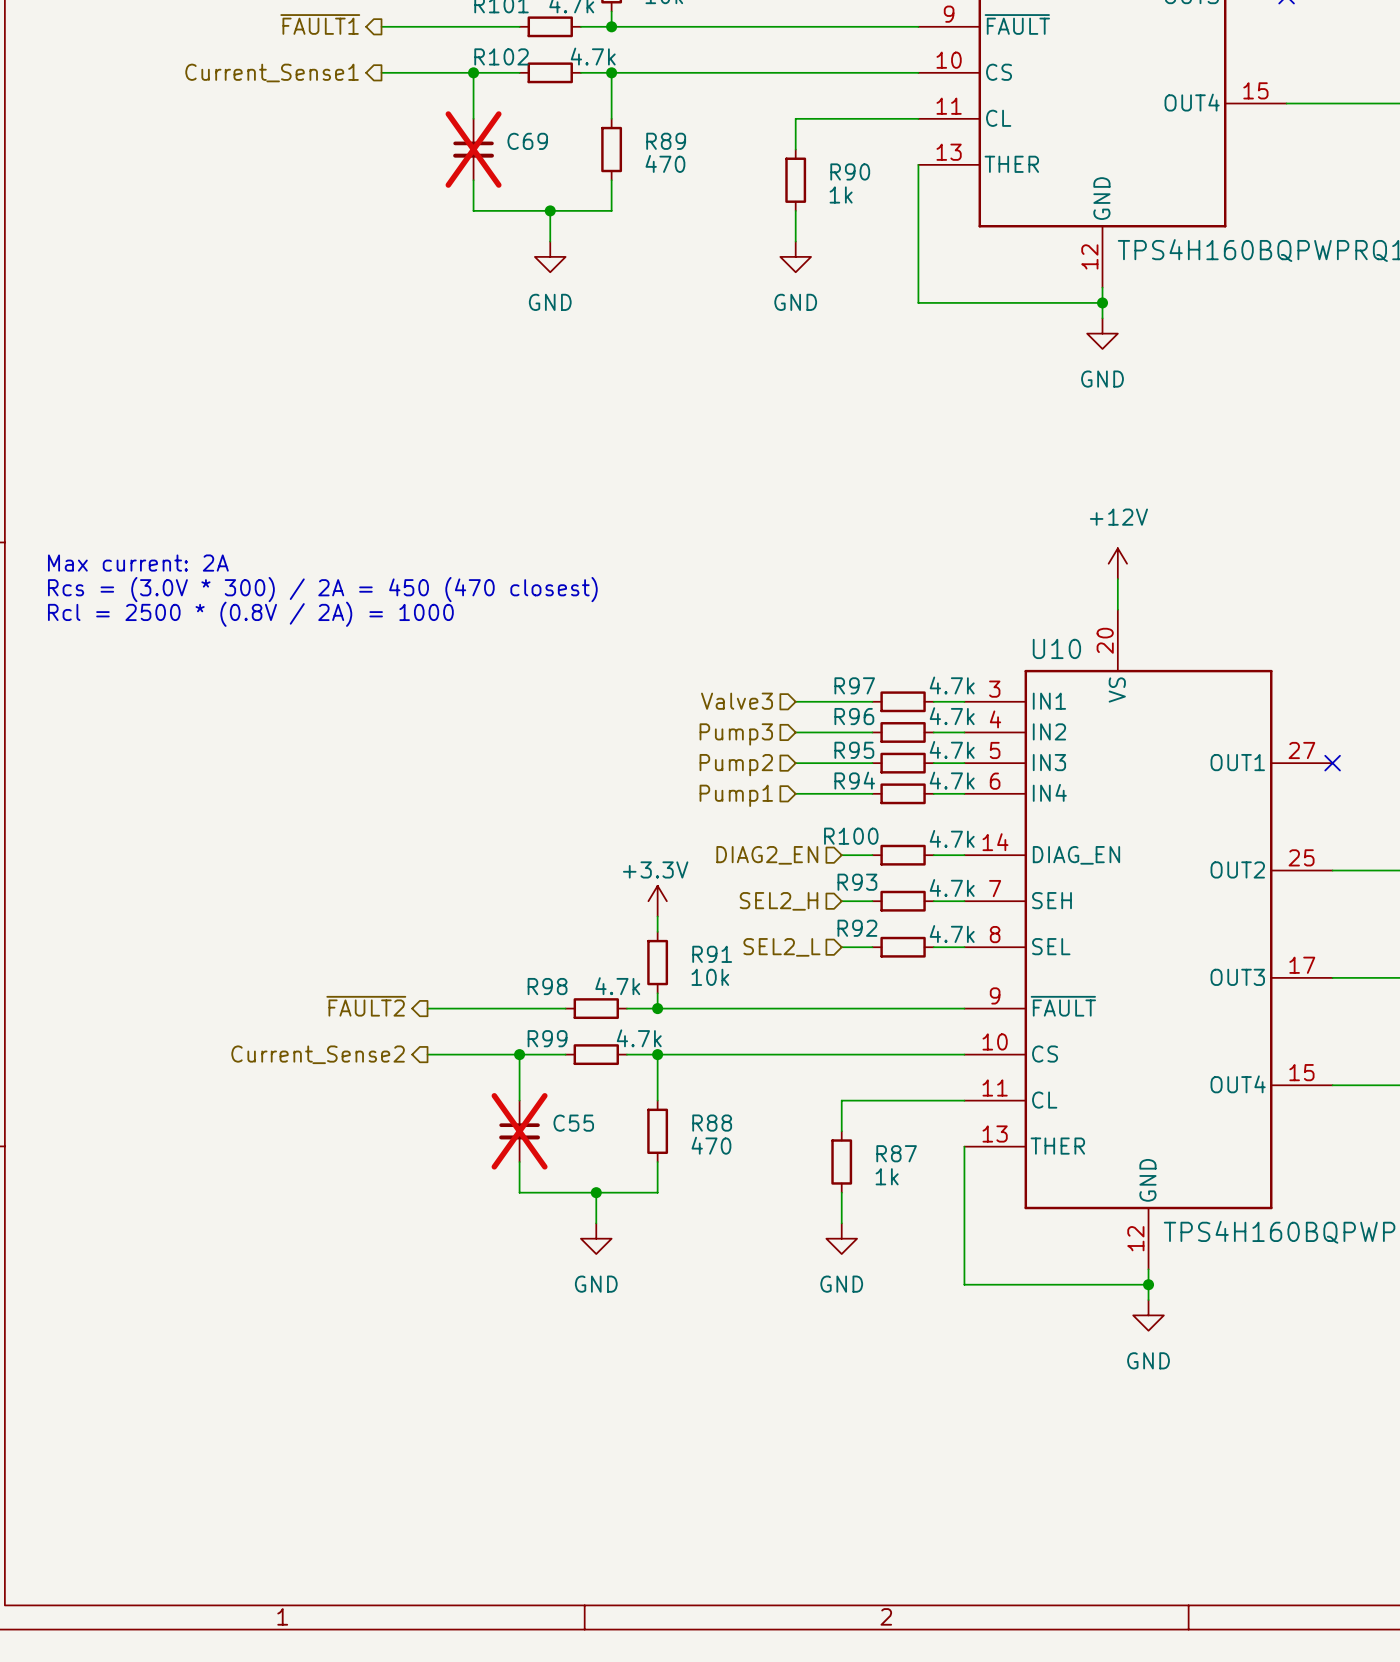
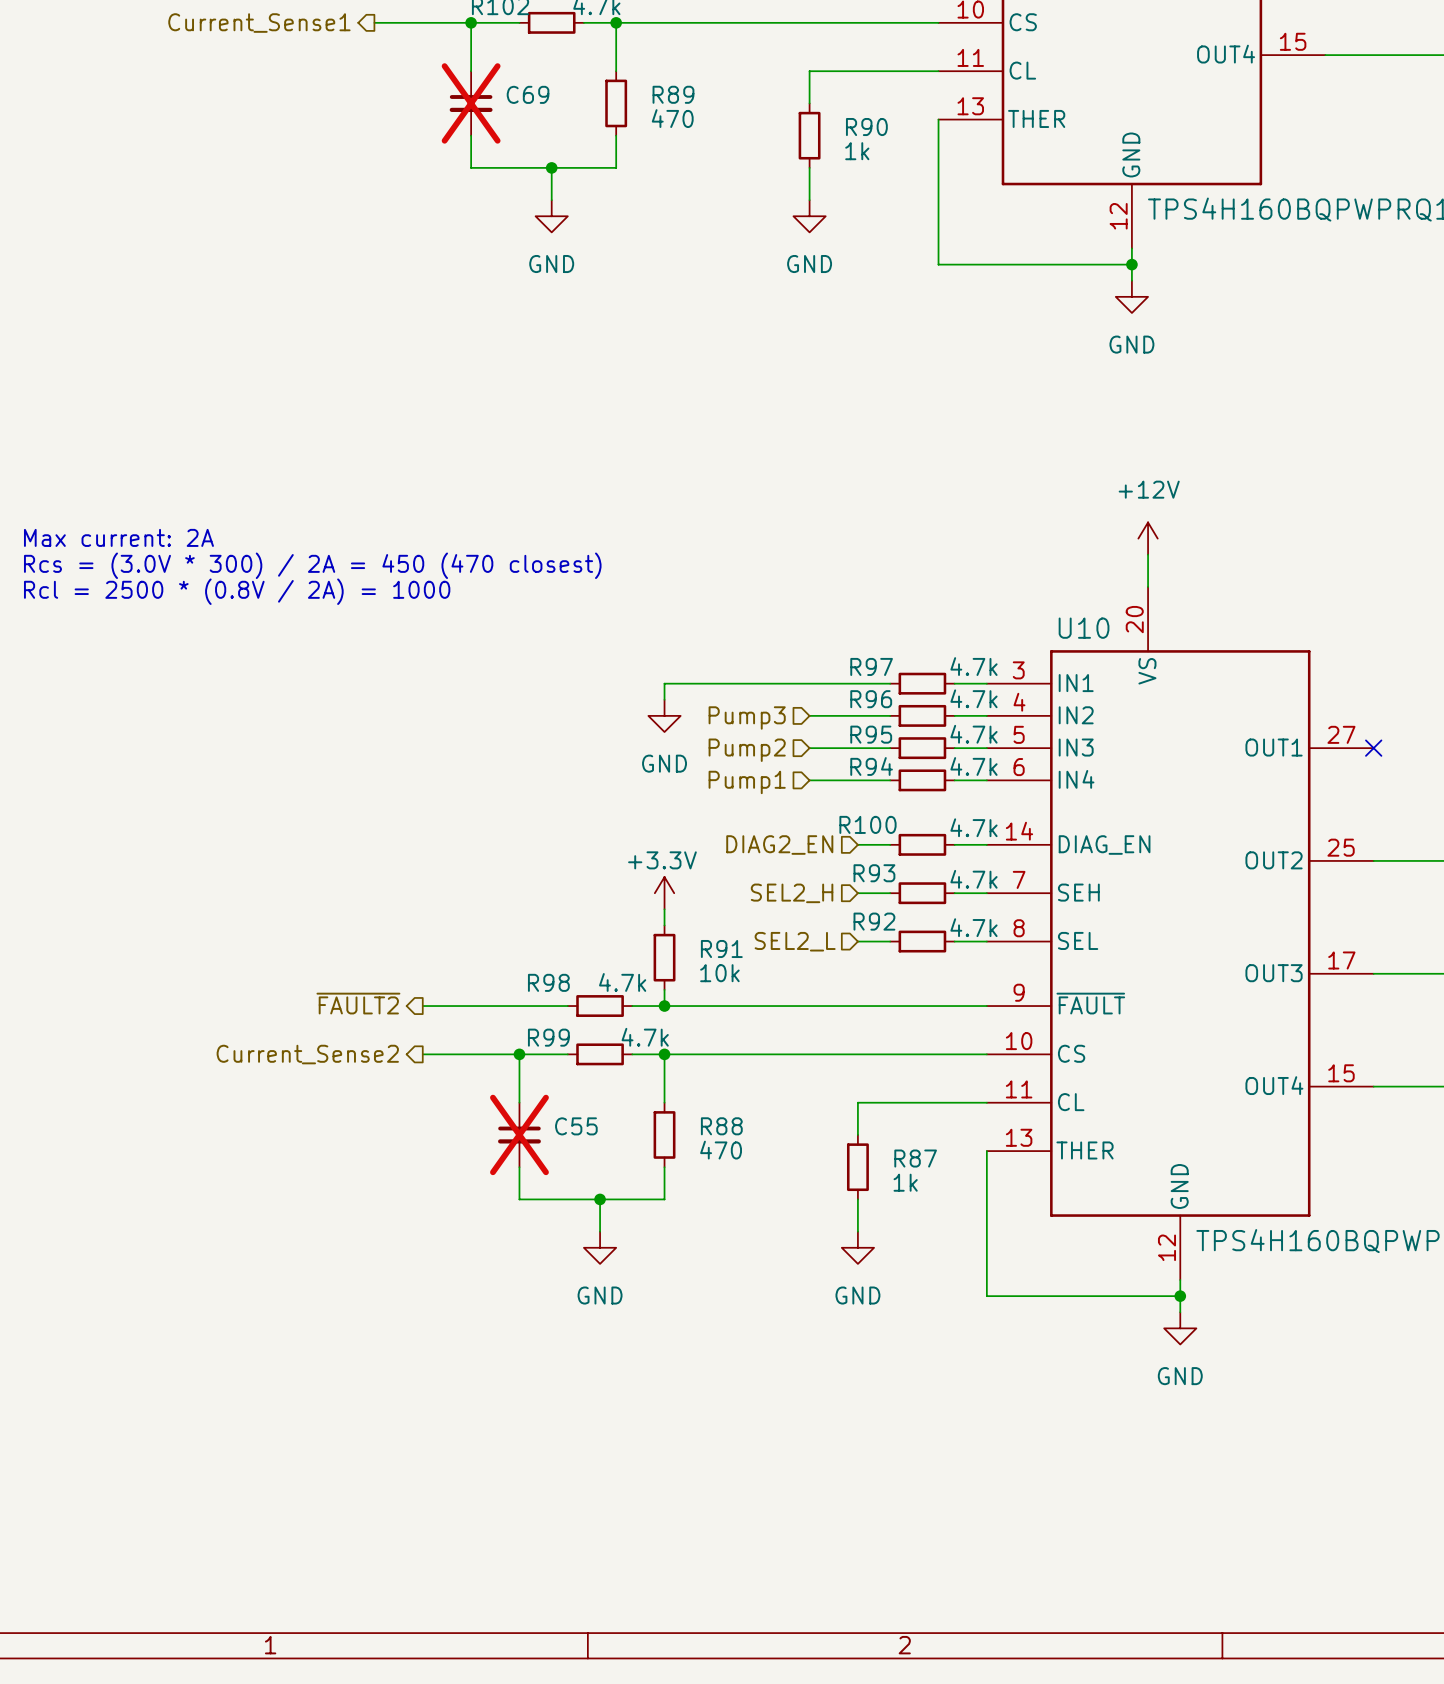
hierarchical label: Valve3 (737, 701) -> none
wire: none -> (809, 683) (664, 683) (664, 699)
power symbol: none -> GND (664, 715)

